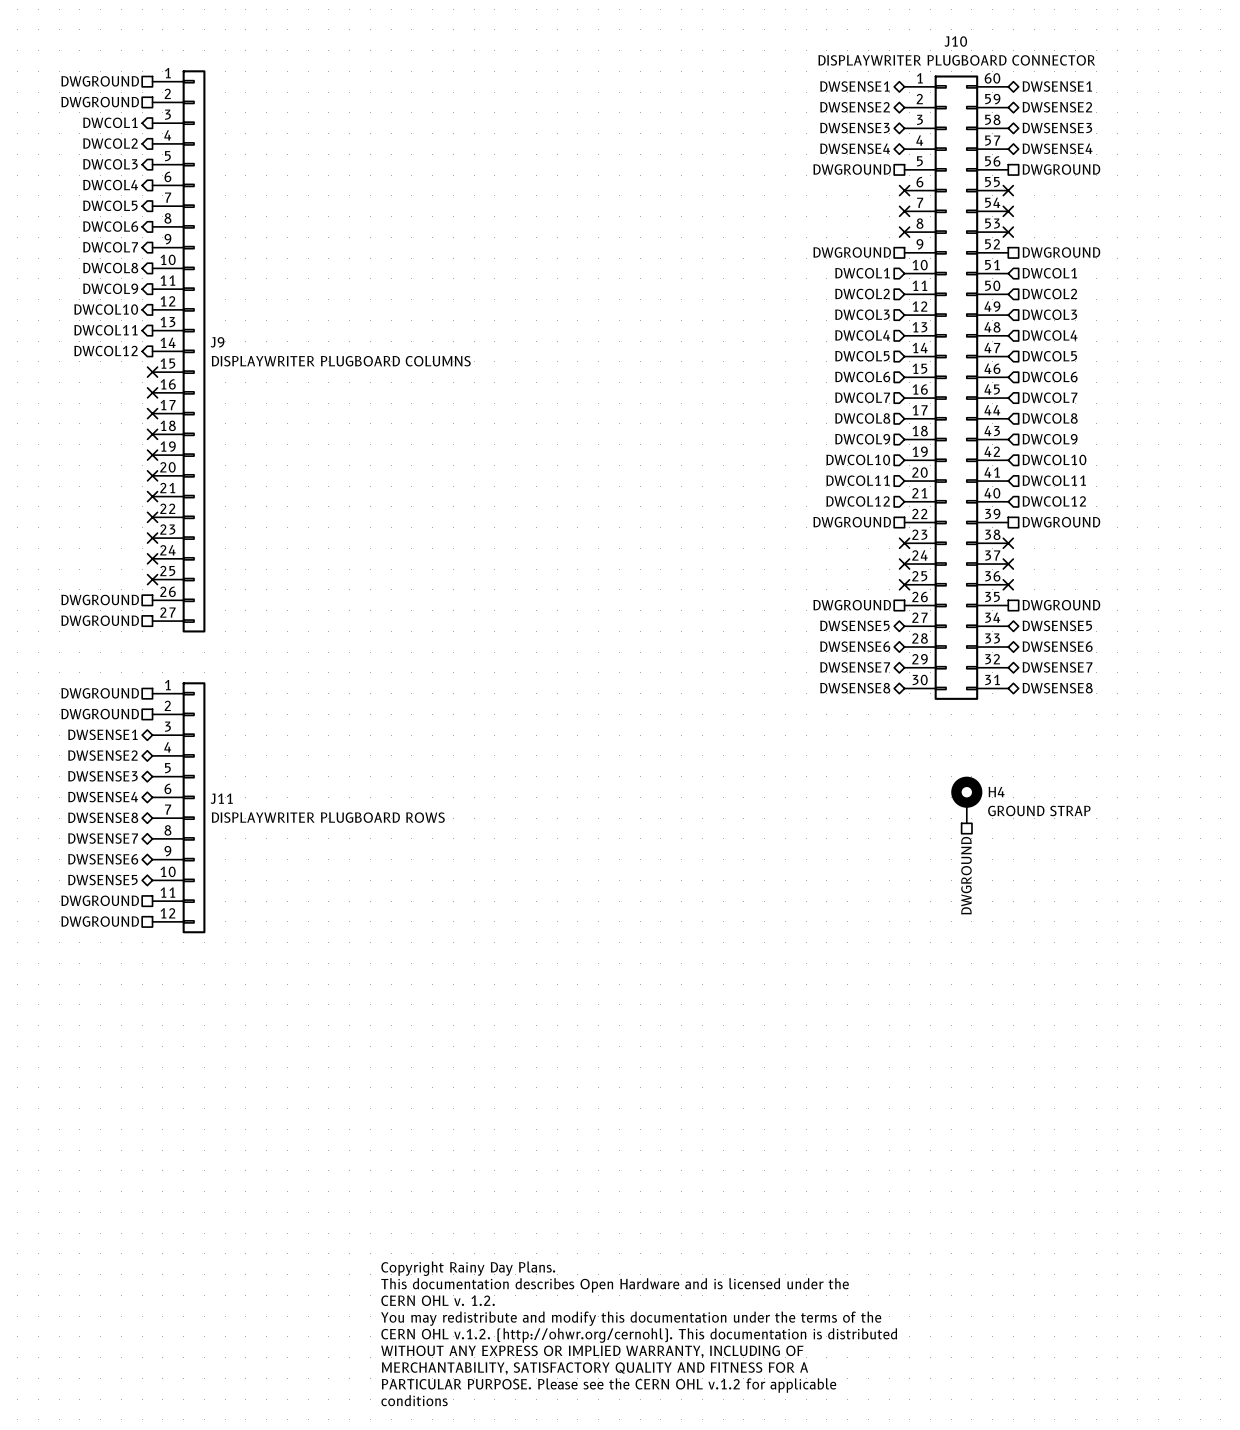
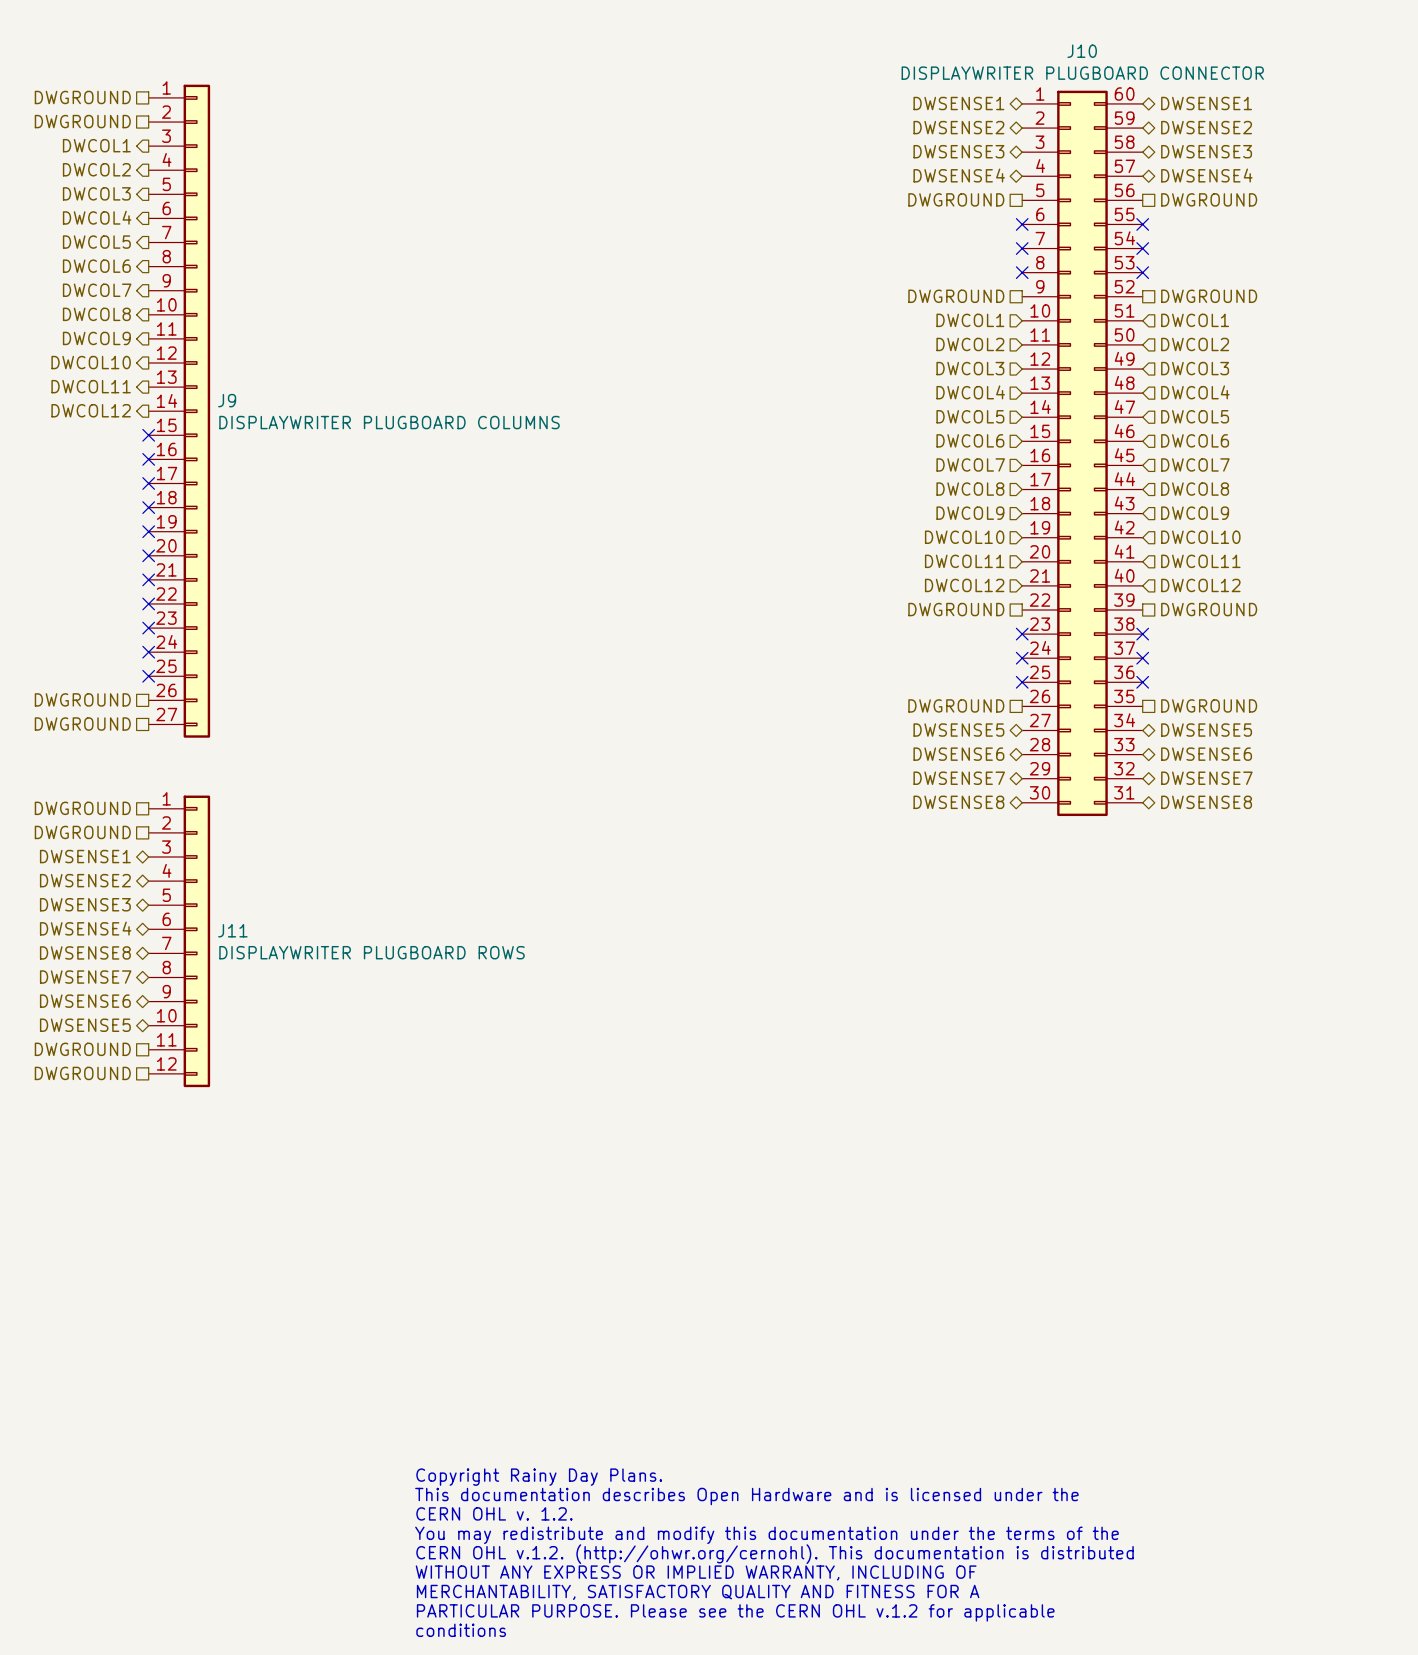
H4: GROUND STRAP (966, 800) -> none
hierarchical label: DWGROUND (966, 875) -> none

